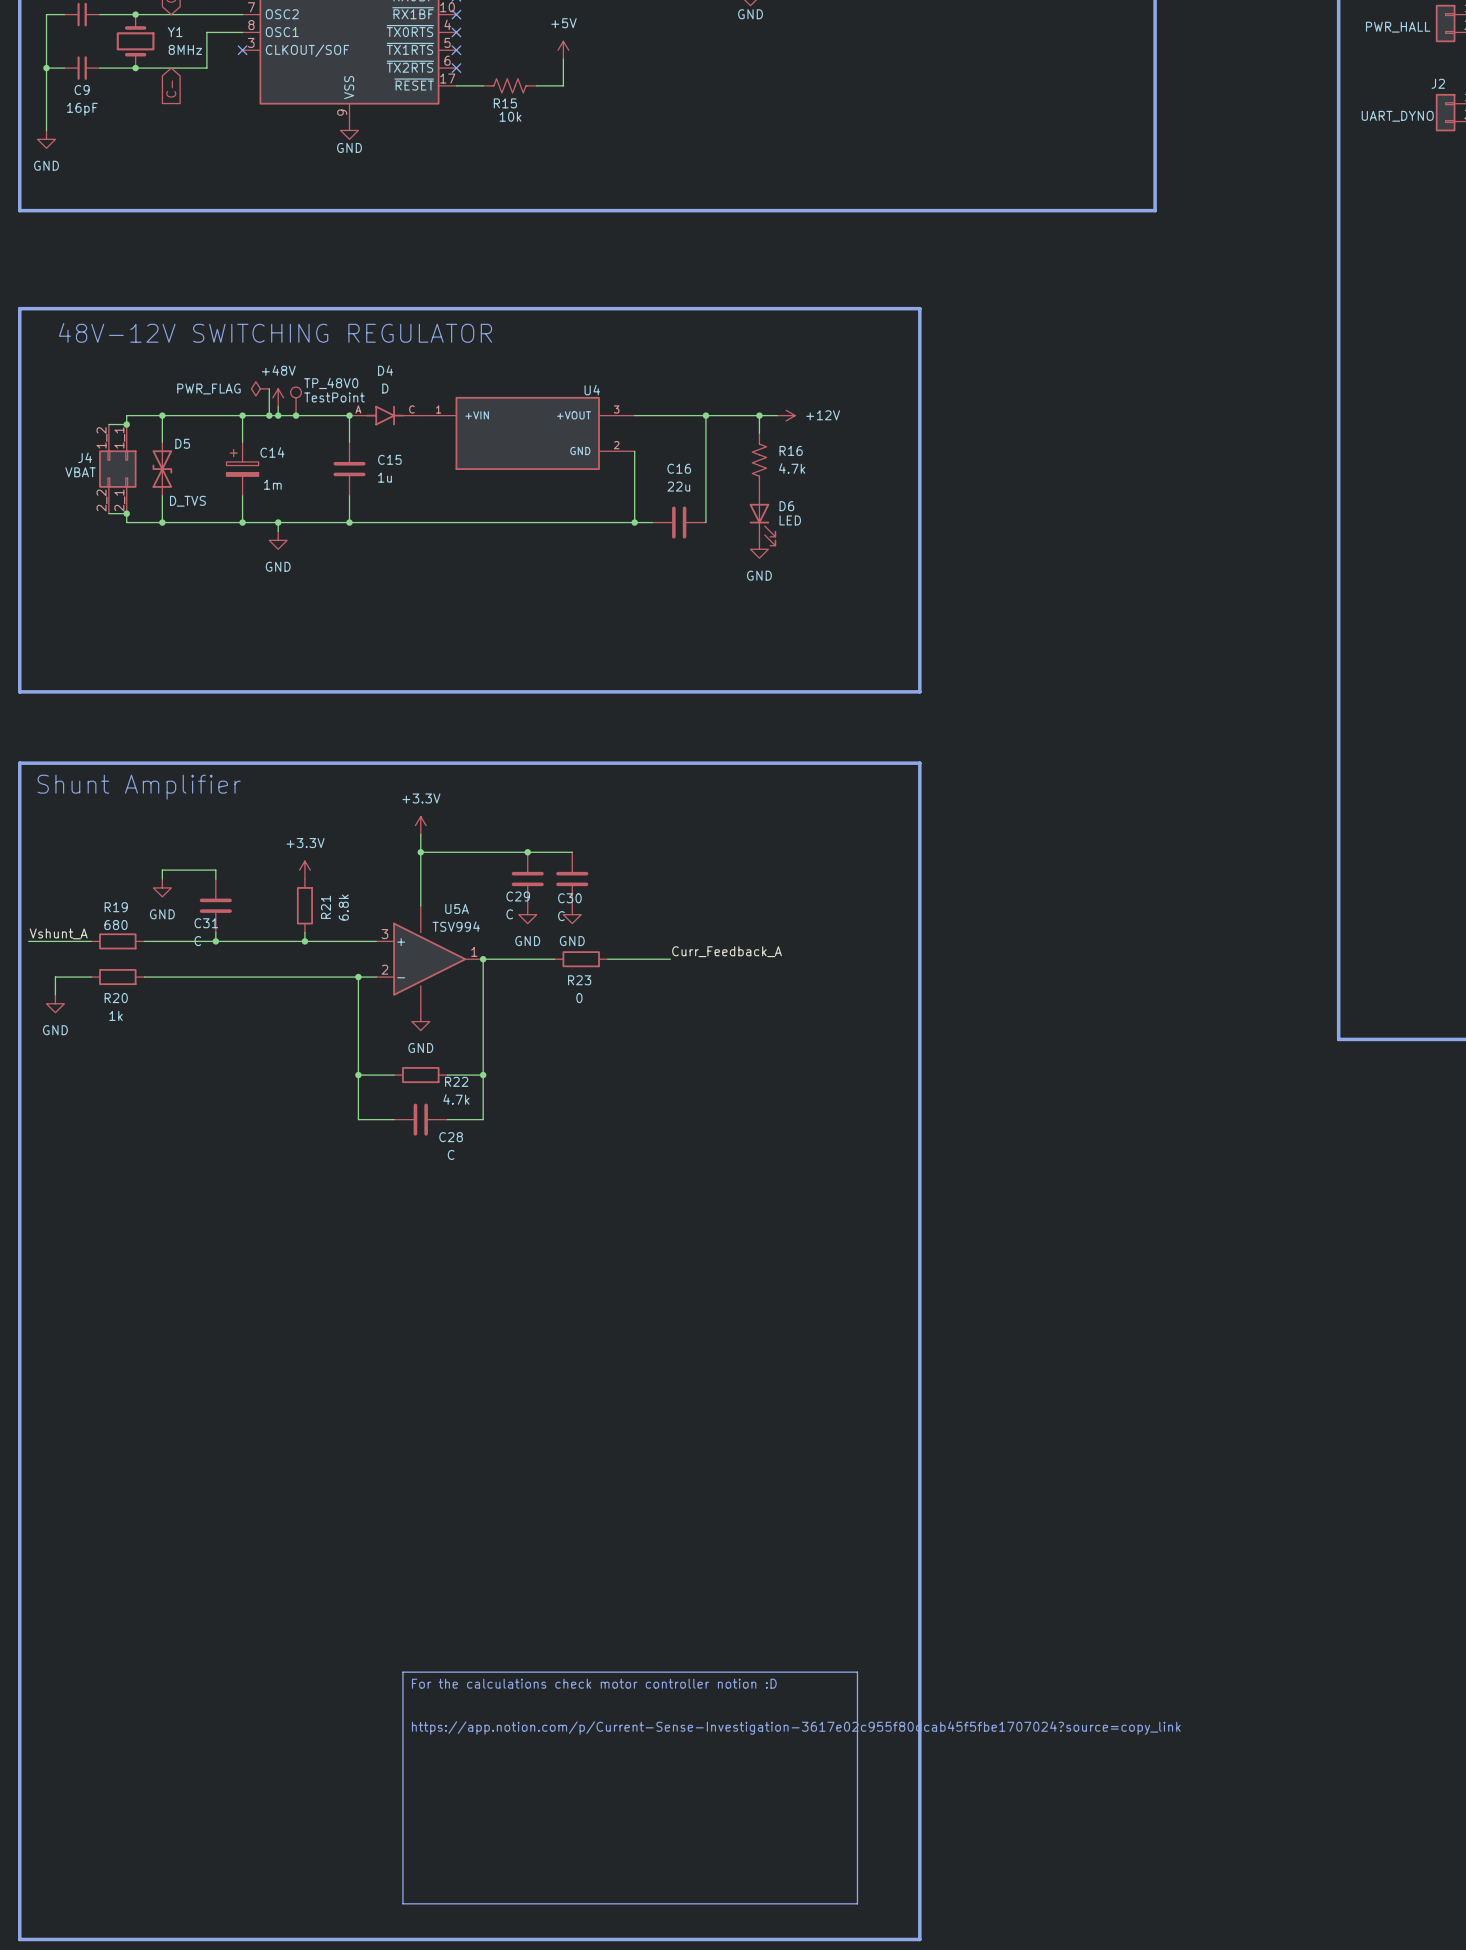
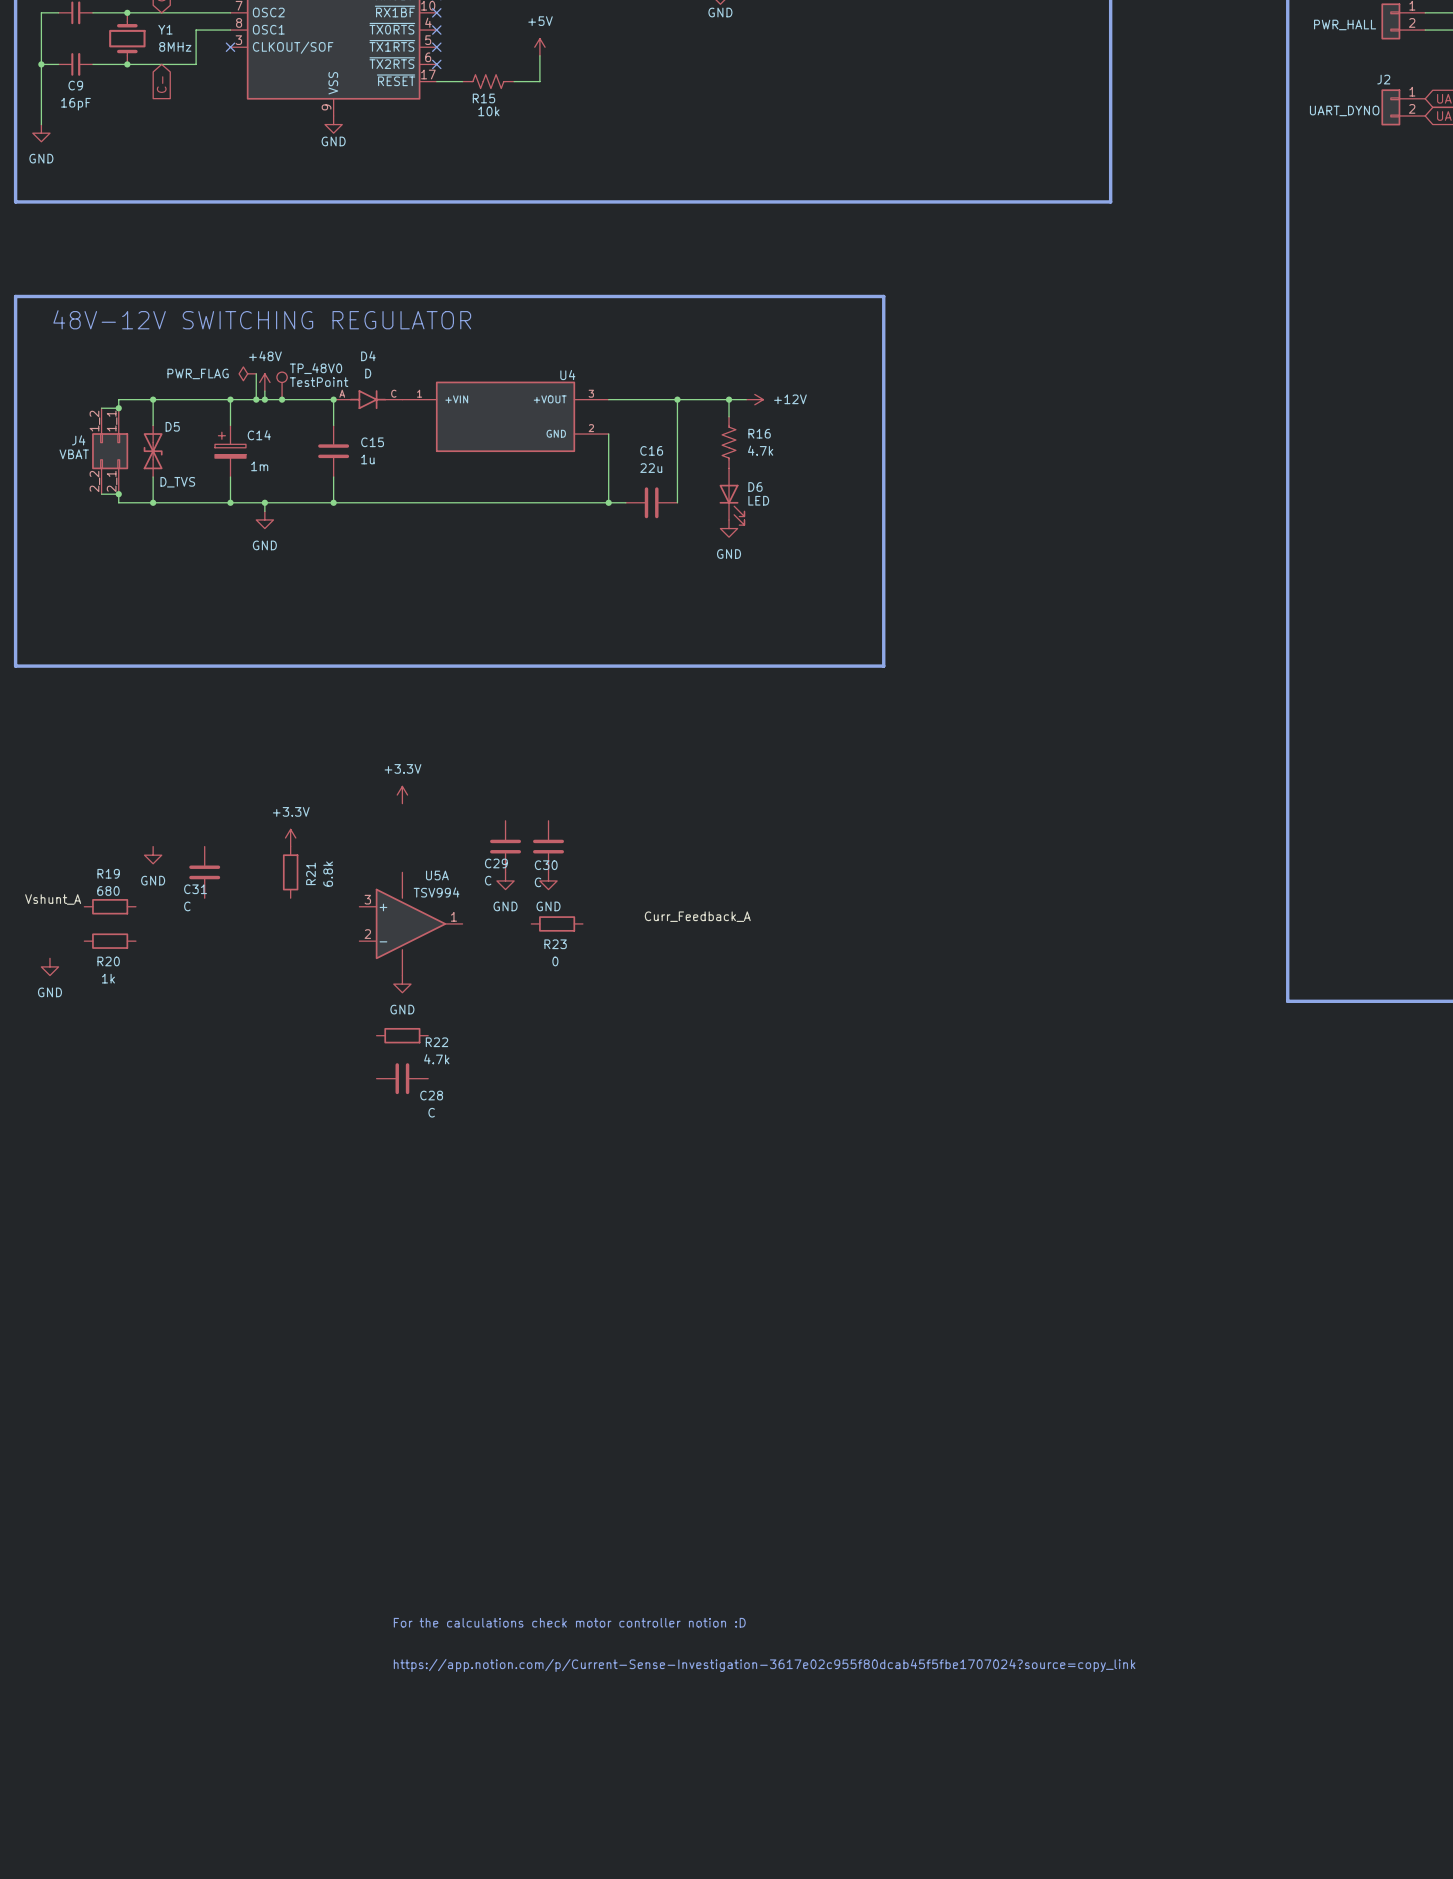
line: (19, 763) (919, 763) (919, 1939) (19, 1939) (19, 763) -> none
text: Shunt Amplifier (139, 787) -> none
wire: (420, 834) (420, 905) -> none
wire: (420, 852) (572, 852) -> none
junction: (420, 852) -> none
junction: (527, 852) -> none
wire: (162, 879) (162, 870) (215, 870) (215, 879) -> none
wire: (215, 932) (215, 941) -> none
wire: (304, 932) (304, 941) -> none
wire: (28, 941) (91, 941) -> none
wire: (144, 941) (376, 941) -> none
junction: (215, 941) -> none
junction: (304, 941) -> none
junction: (483, 959) -> none
wire: (554, 959) (483, 959) (483, 1119) (447, 1119) -> none
wire: (607, 959) (670, 959) -> none
wire: (91, 977) (55, 977) (55, 994) -> none
wire: (144, 977) (376, 977) -> none
wire: (358, 977) (358, 1119) (394, 1119) -> none
junction: (358, 977) -> none
wire: (358, 1075) (394, 1075) -> none
junction: (358, 1075) -> none
wire: (447, 1075) (483, 1075) -> none
junction: (483, 1075) -> none
line: (402, 1672) (857, 1672) (857, 1903) (402, 1903) (402, 1672) -> none

